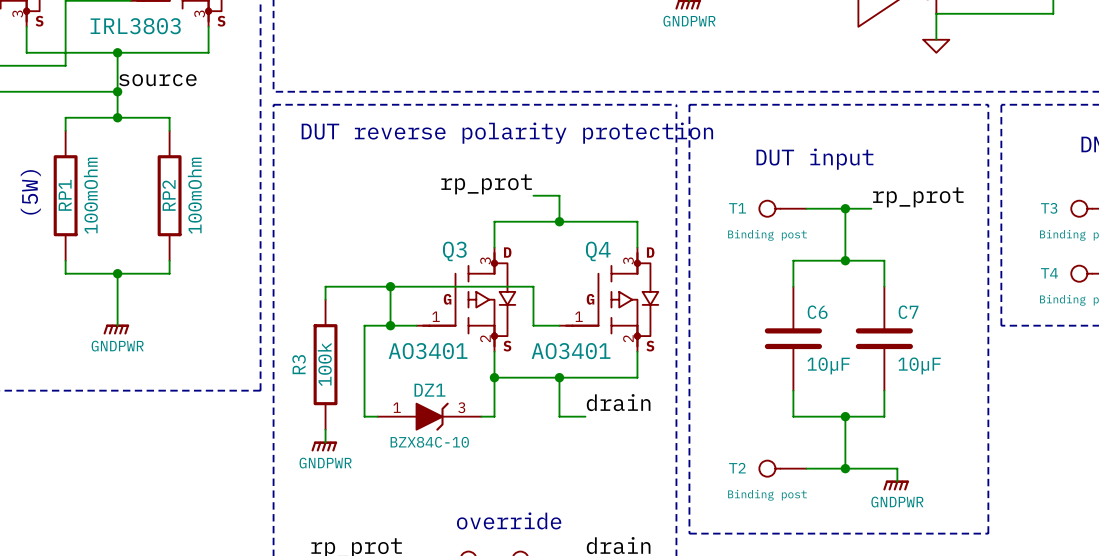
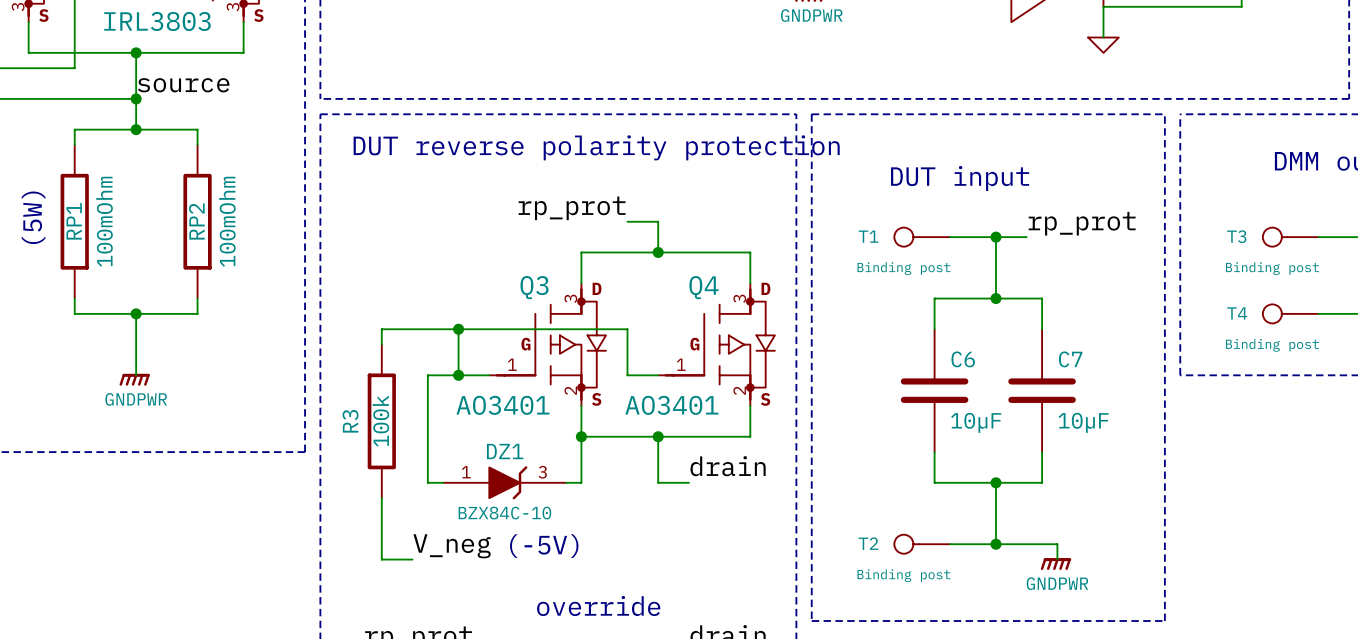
wire: none -> (381, 513) (381, 559) (412, 559)
power symbol: GNDPWR (324, 446) -> none
label: none -> V_neg (452, 546)
text: none -> (-5V) (544, 546)

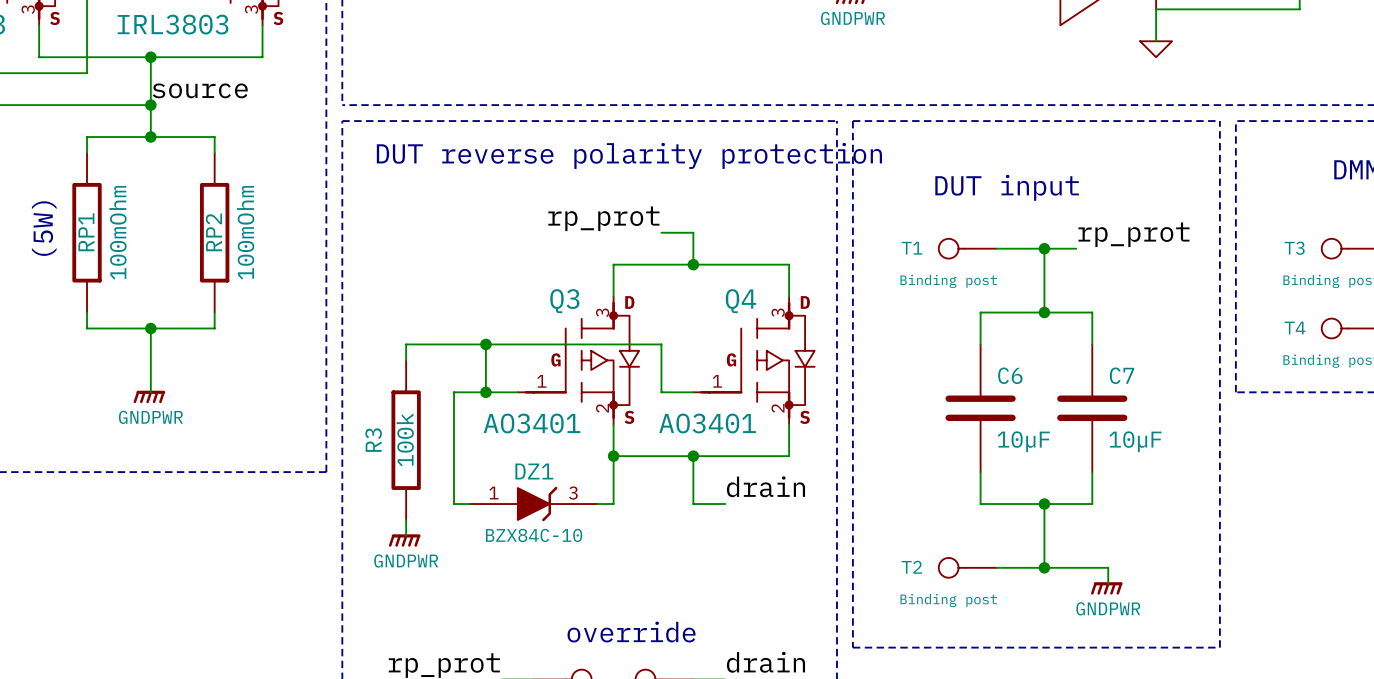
wire: (381, 513) (381, 559) (412, 559) -> none
power symbol: none -> GNDPWR (404, 540)
label: V_neg (452, 546) -> none
text: (-5V) (544, 546) -> none

